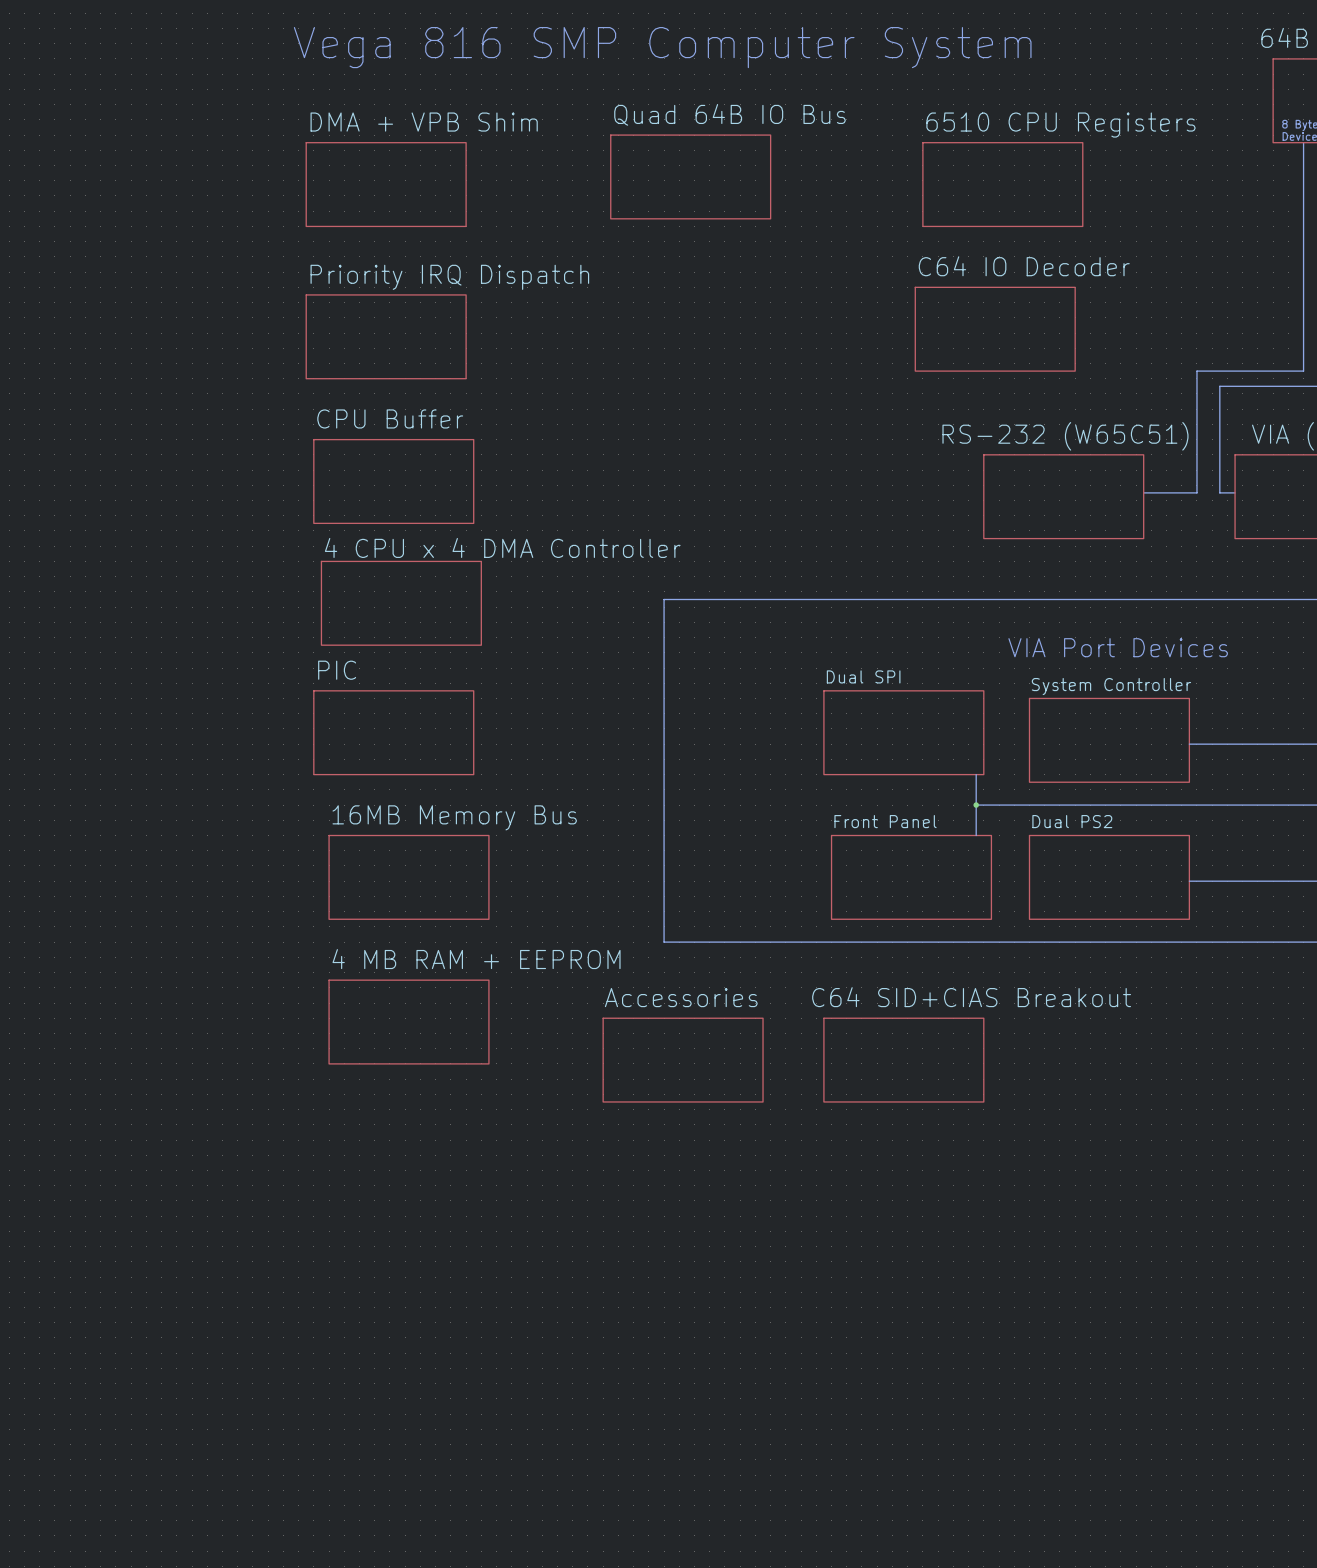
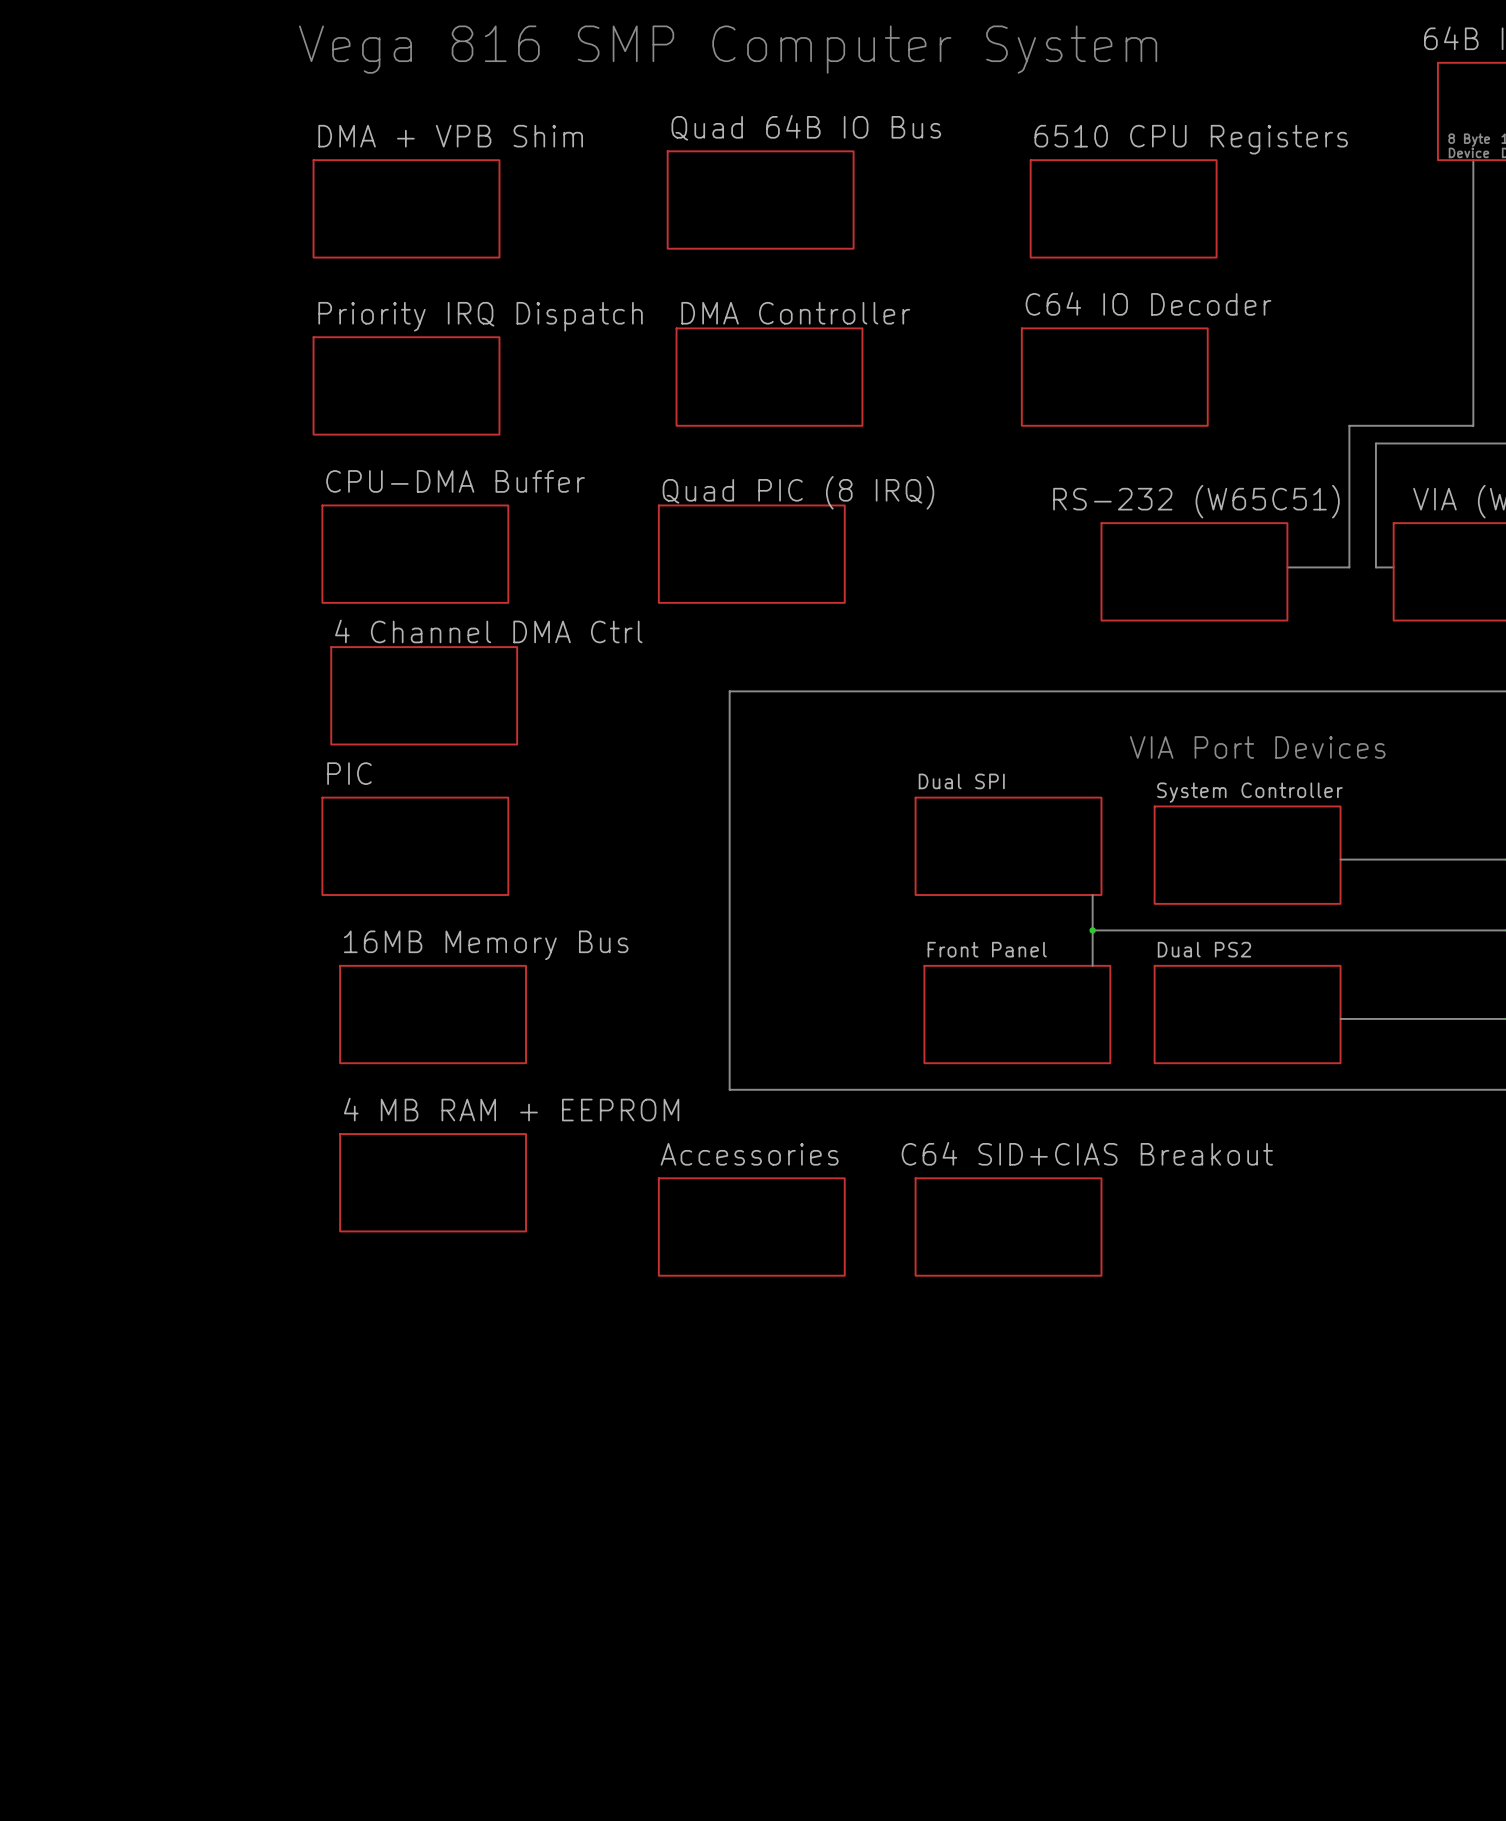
sheet DMA Controller: none -> (769, 377)
sheet CPU Buffer name: CPU Buffer (390, 418) -> CPU-DMA Buffer (455, 481)
sheet Quad PIC (8 IRQ): none -> (751, 554)
sheet 4 CPU x 4 DMA Controller name: 4 CPU x 4 DMA Controller (502, 547) -> 4 Channel DMA Ctrl (488, 631)

